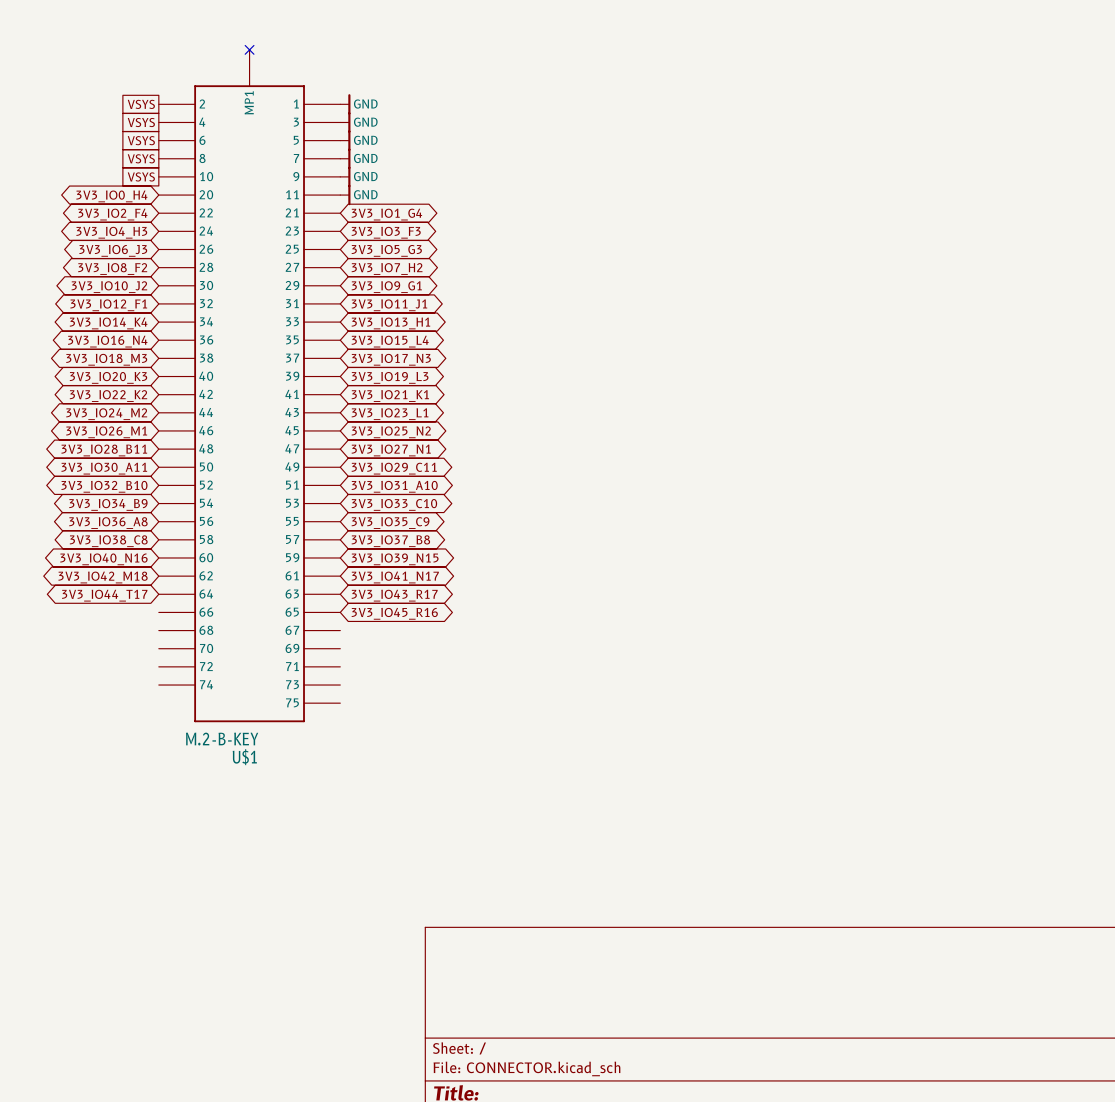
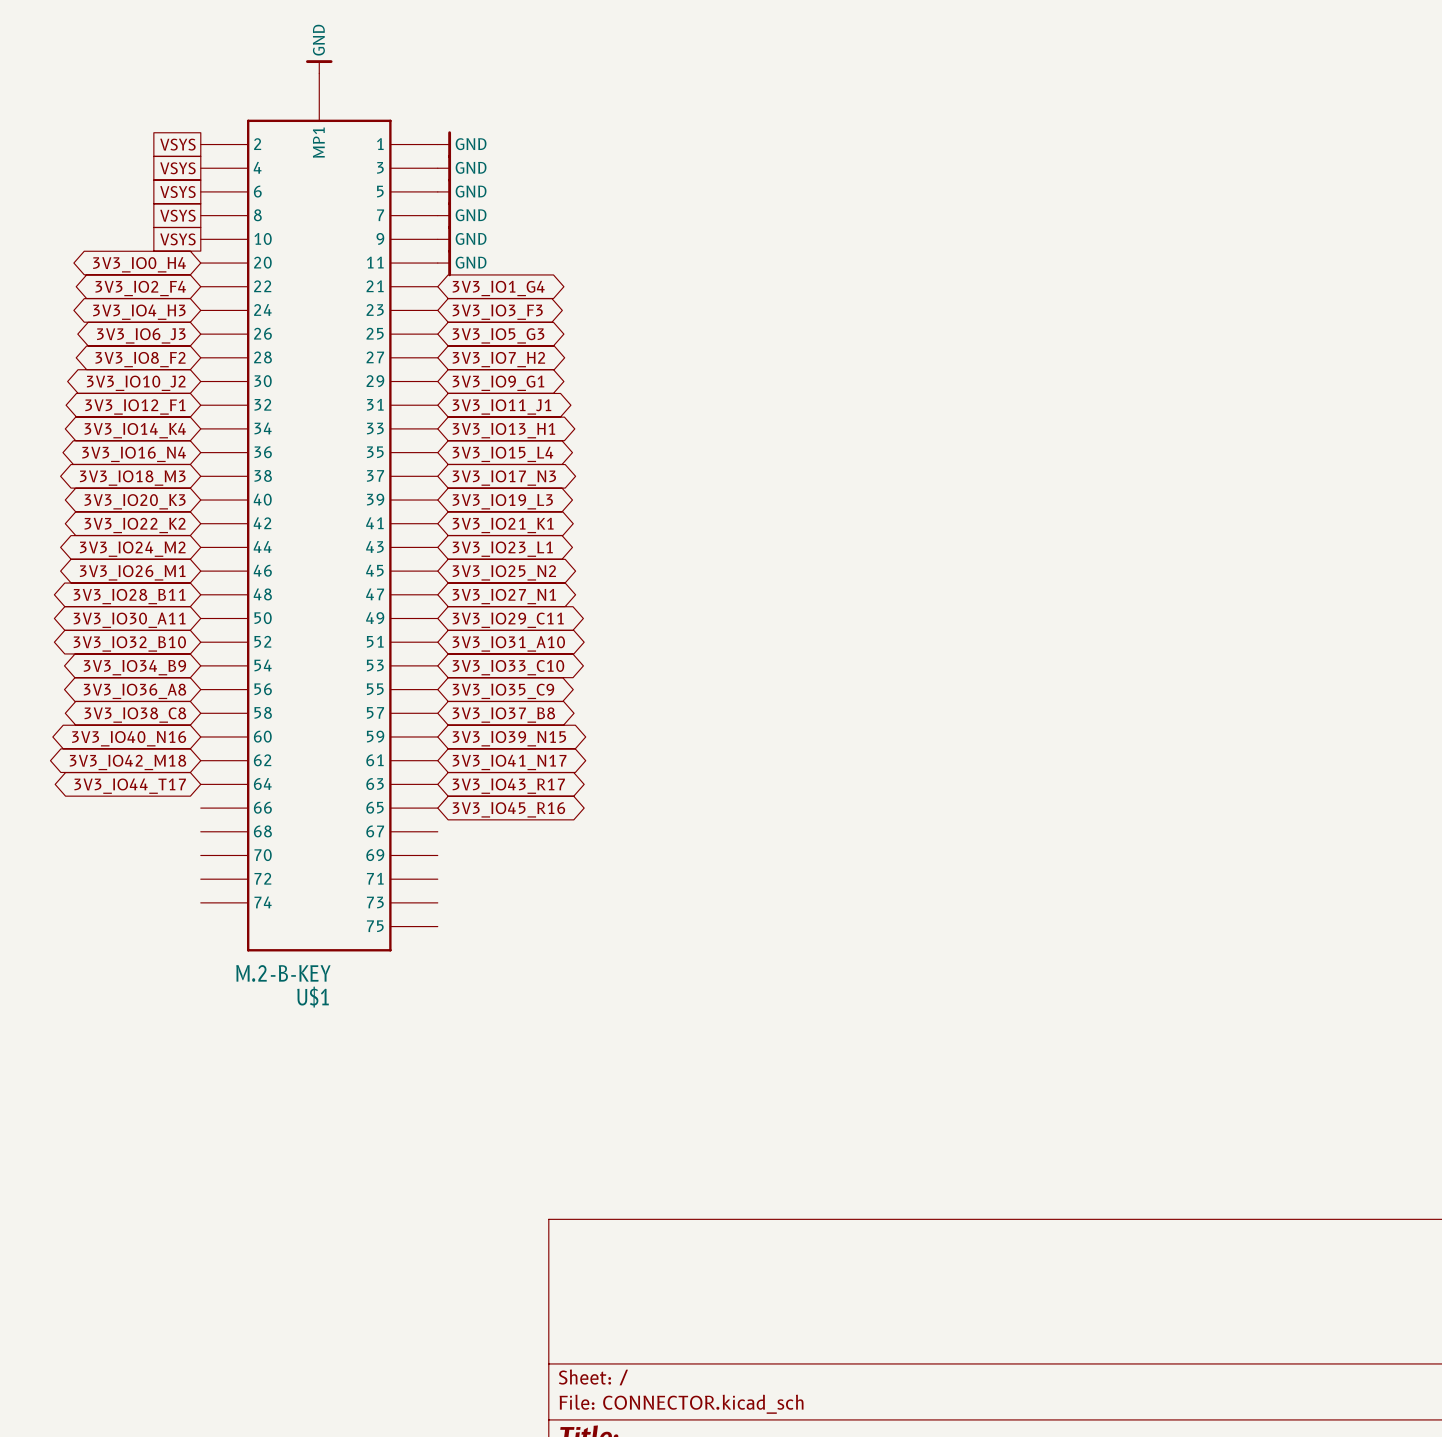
power symbol: none -> GND (319, 66)
no-connect mark: (249, 49) -> none

